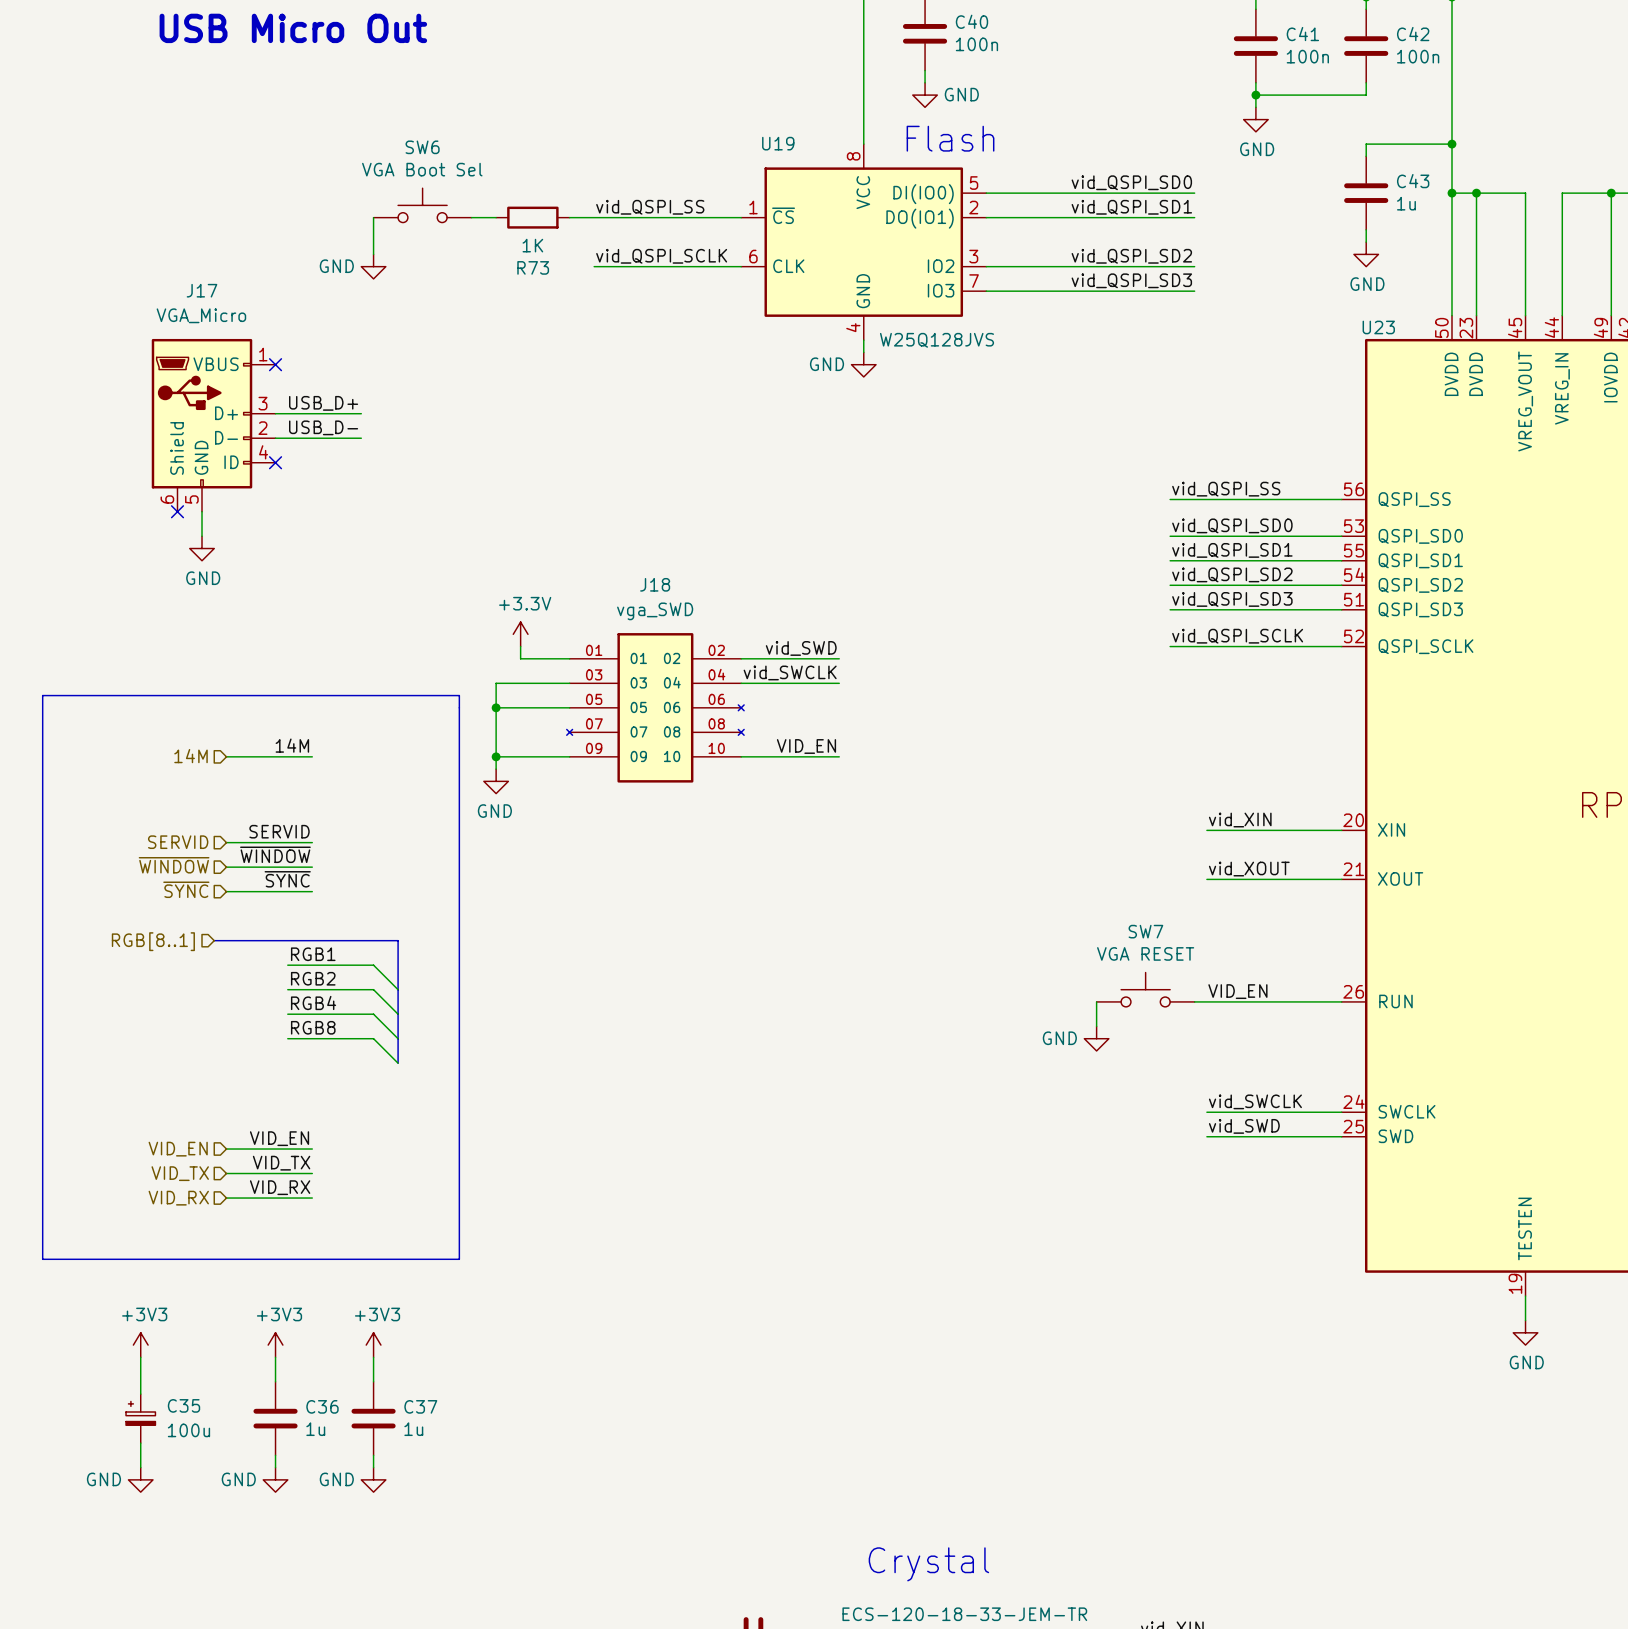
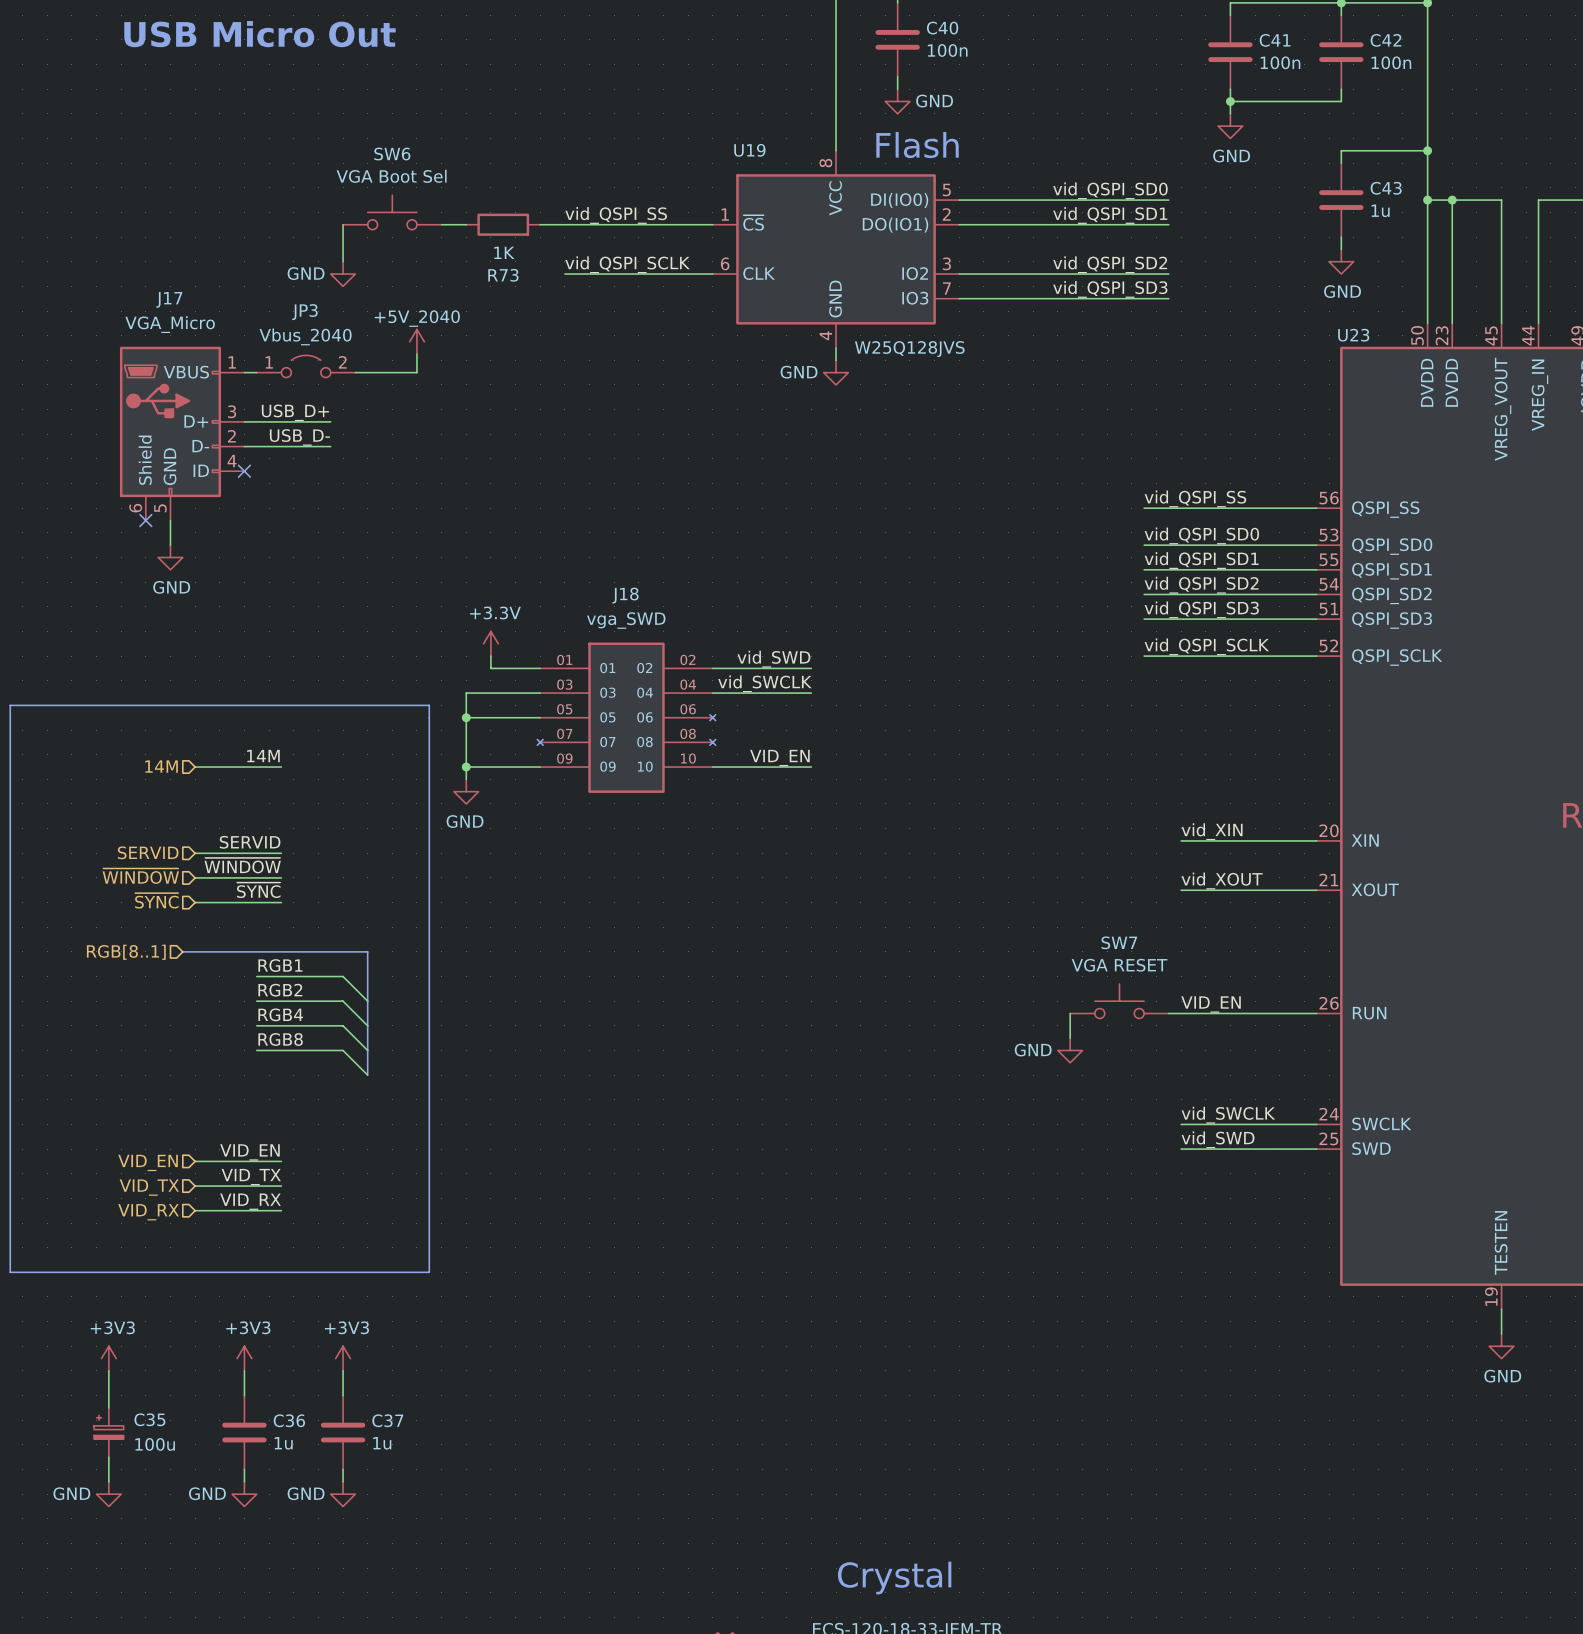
power symbol: none -> +5V_2040 (416, 341)
wire: none -> (416, 354) (416, 372) (355, 372)
JP3: none -> Vbus_2040 (306, 366)
wire: none -> (244, 372) (256, 372)
no-connect mark: (275, 364) -> none

